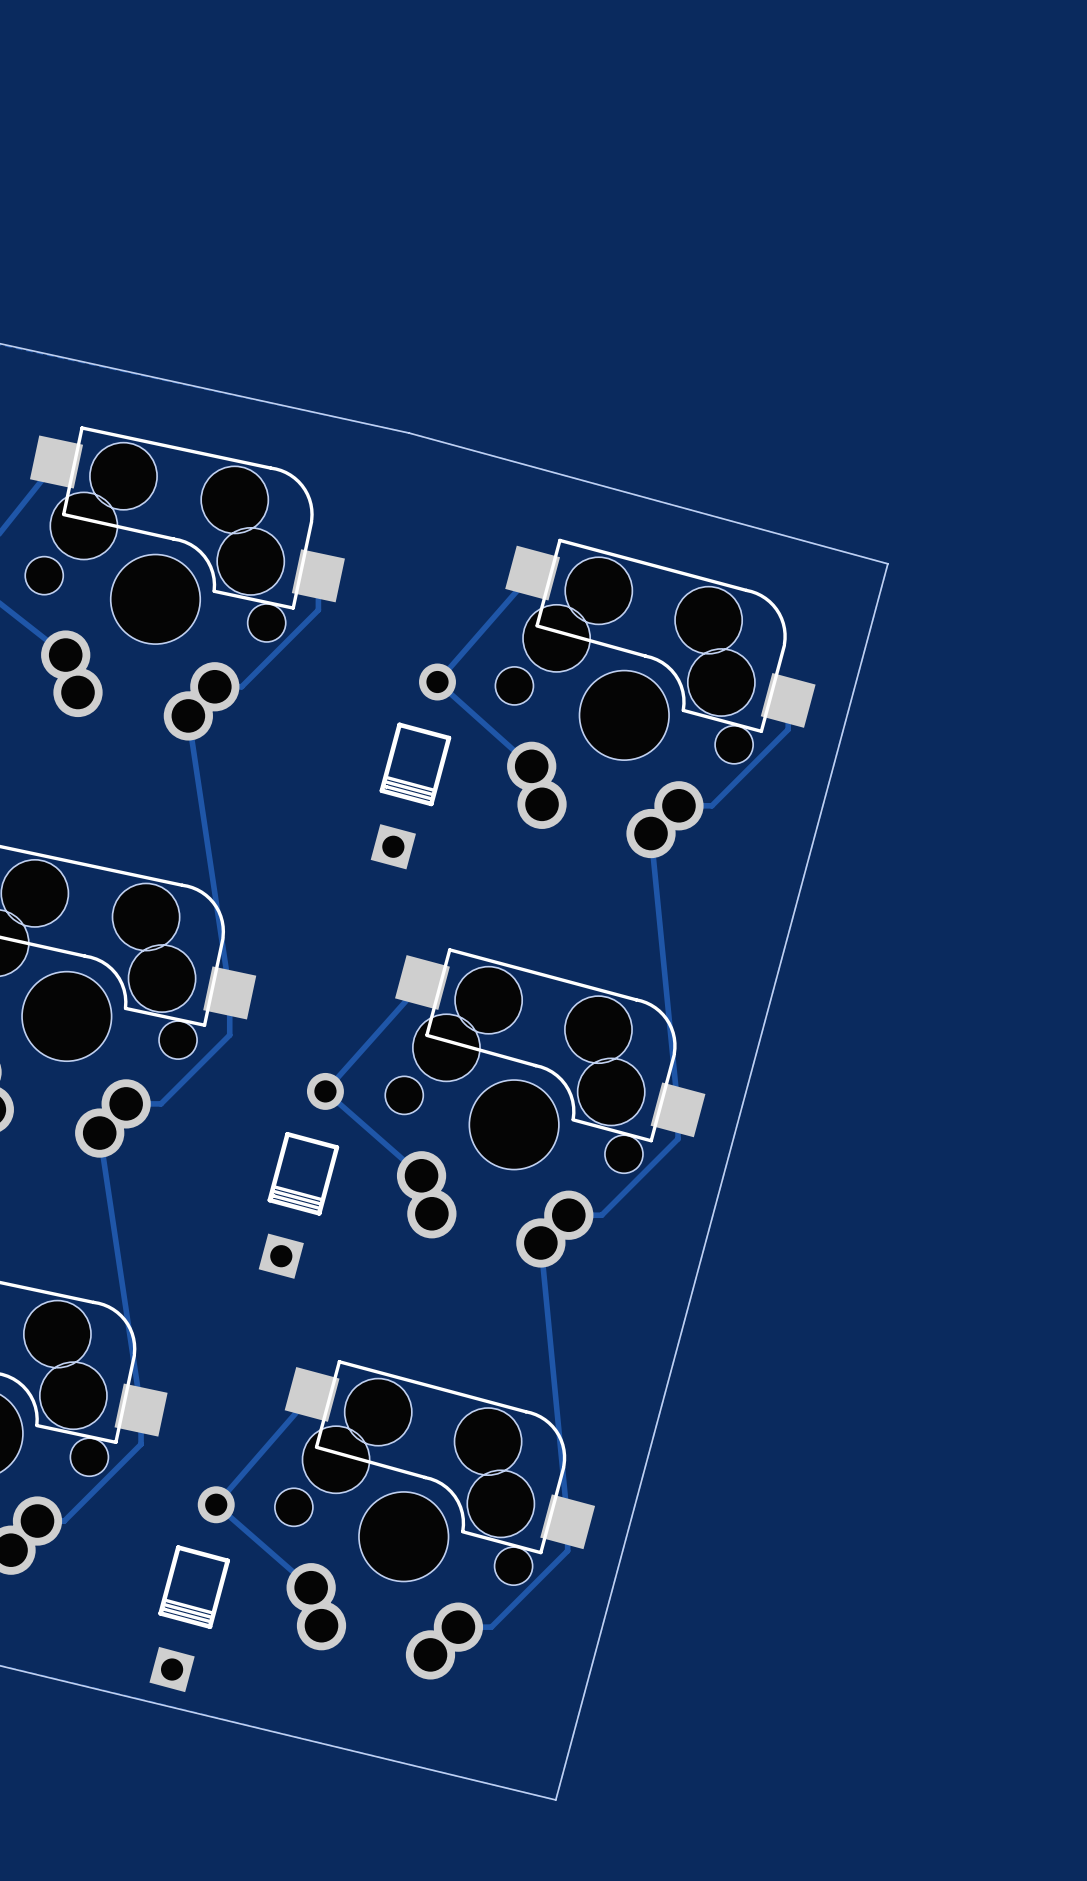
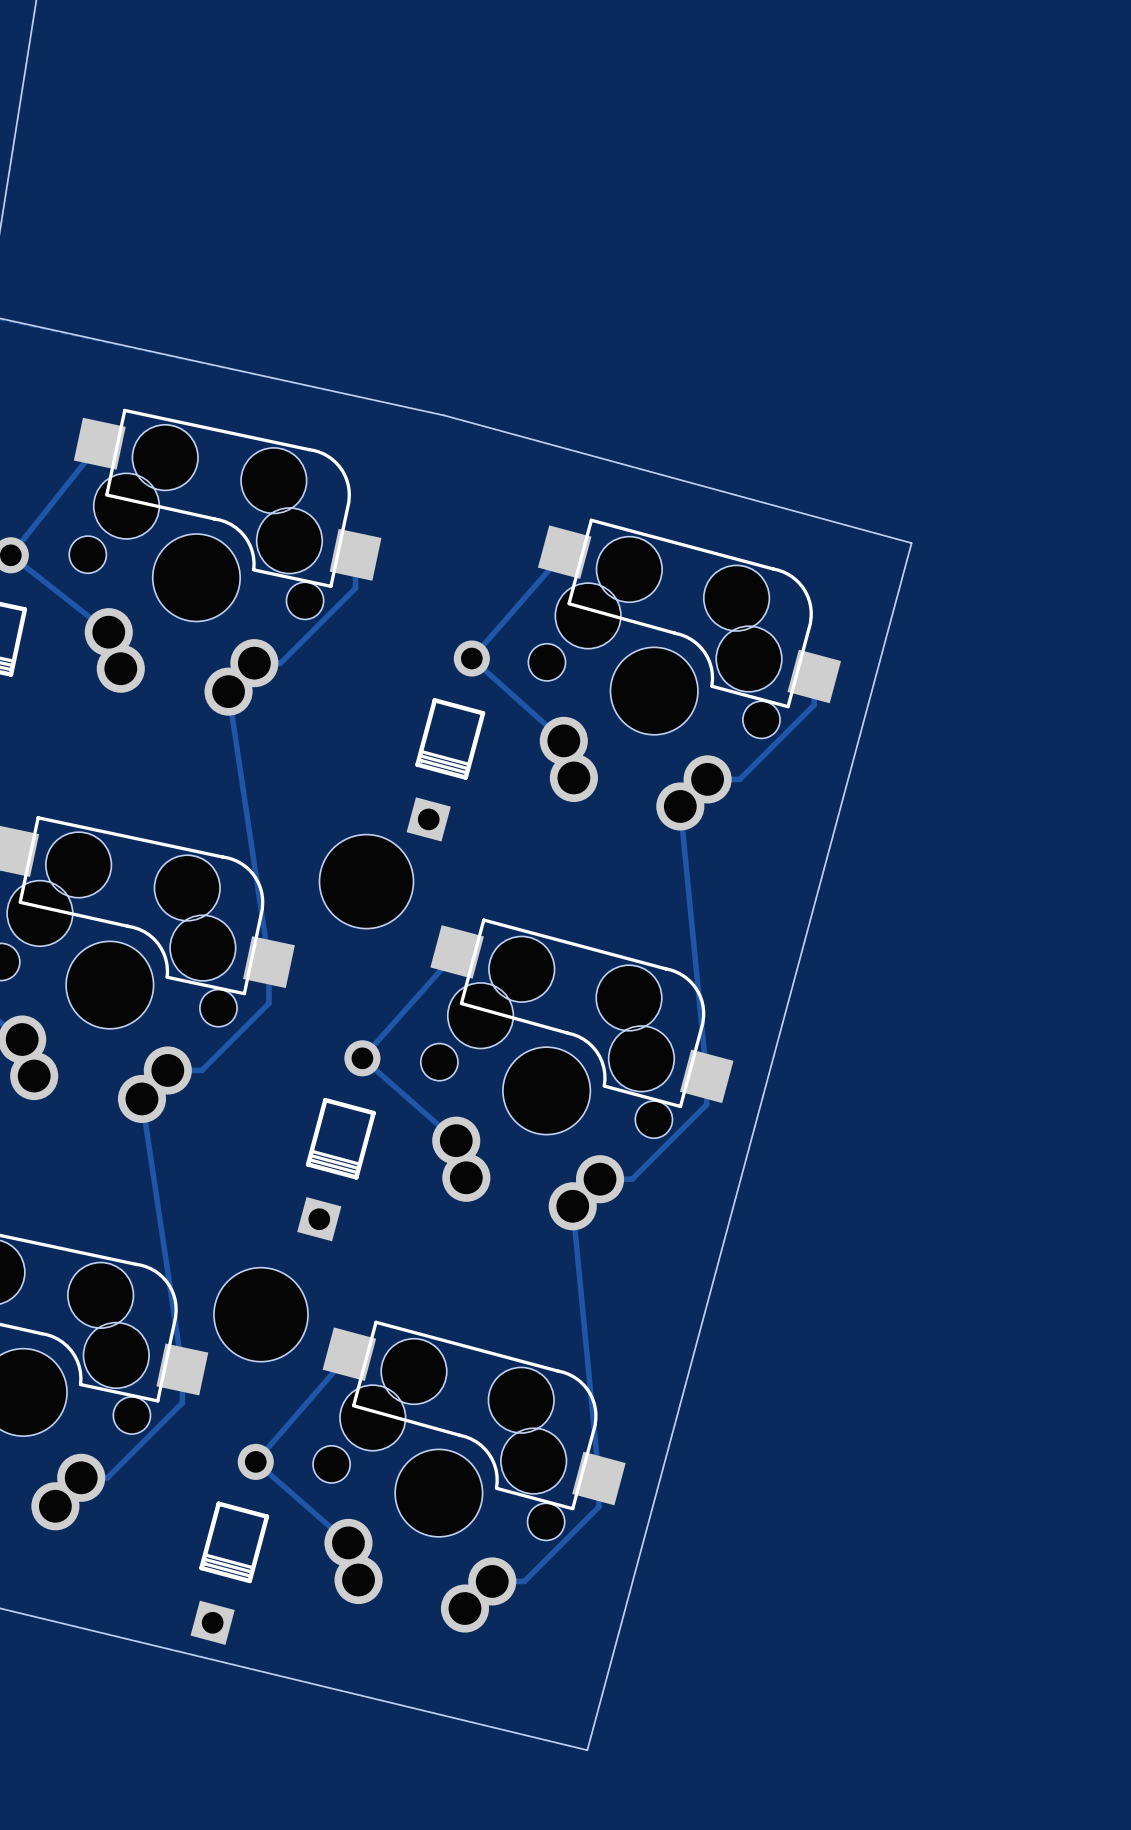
part: none -> (366, 881)
part: none -> (261, 1314)

